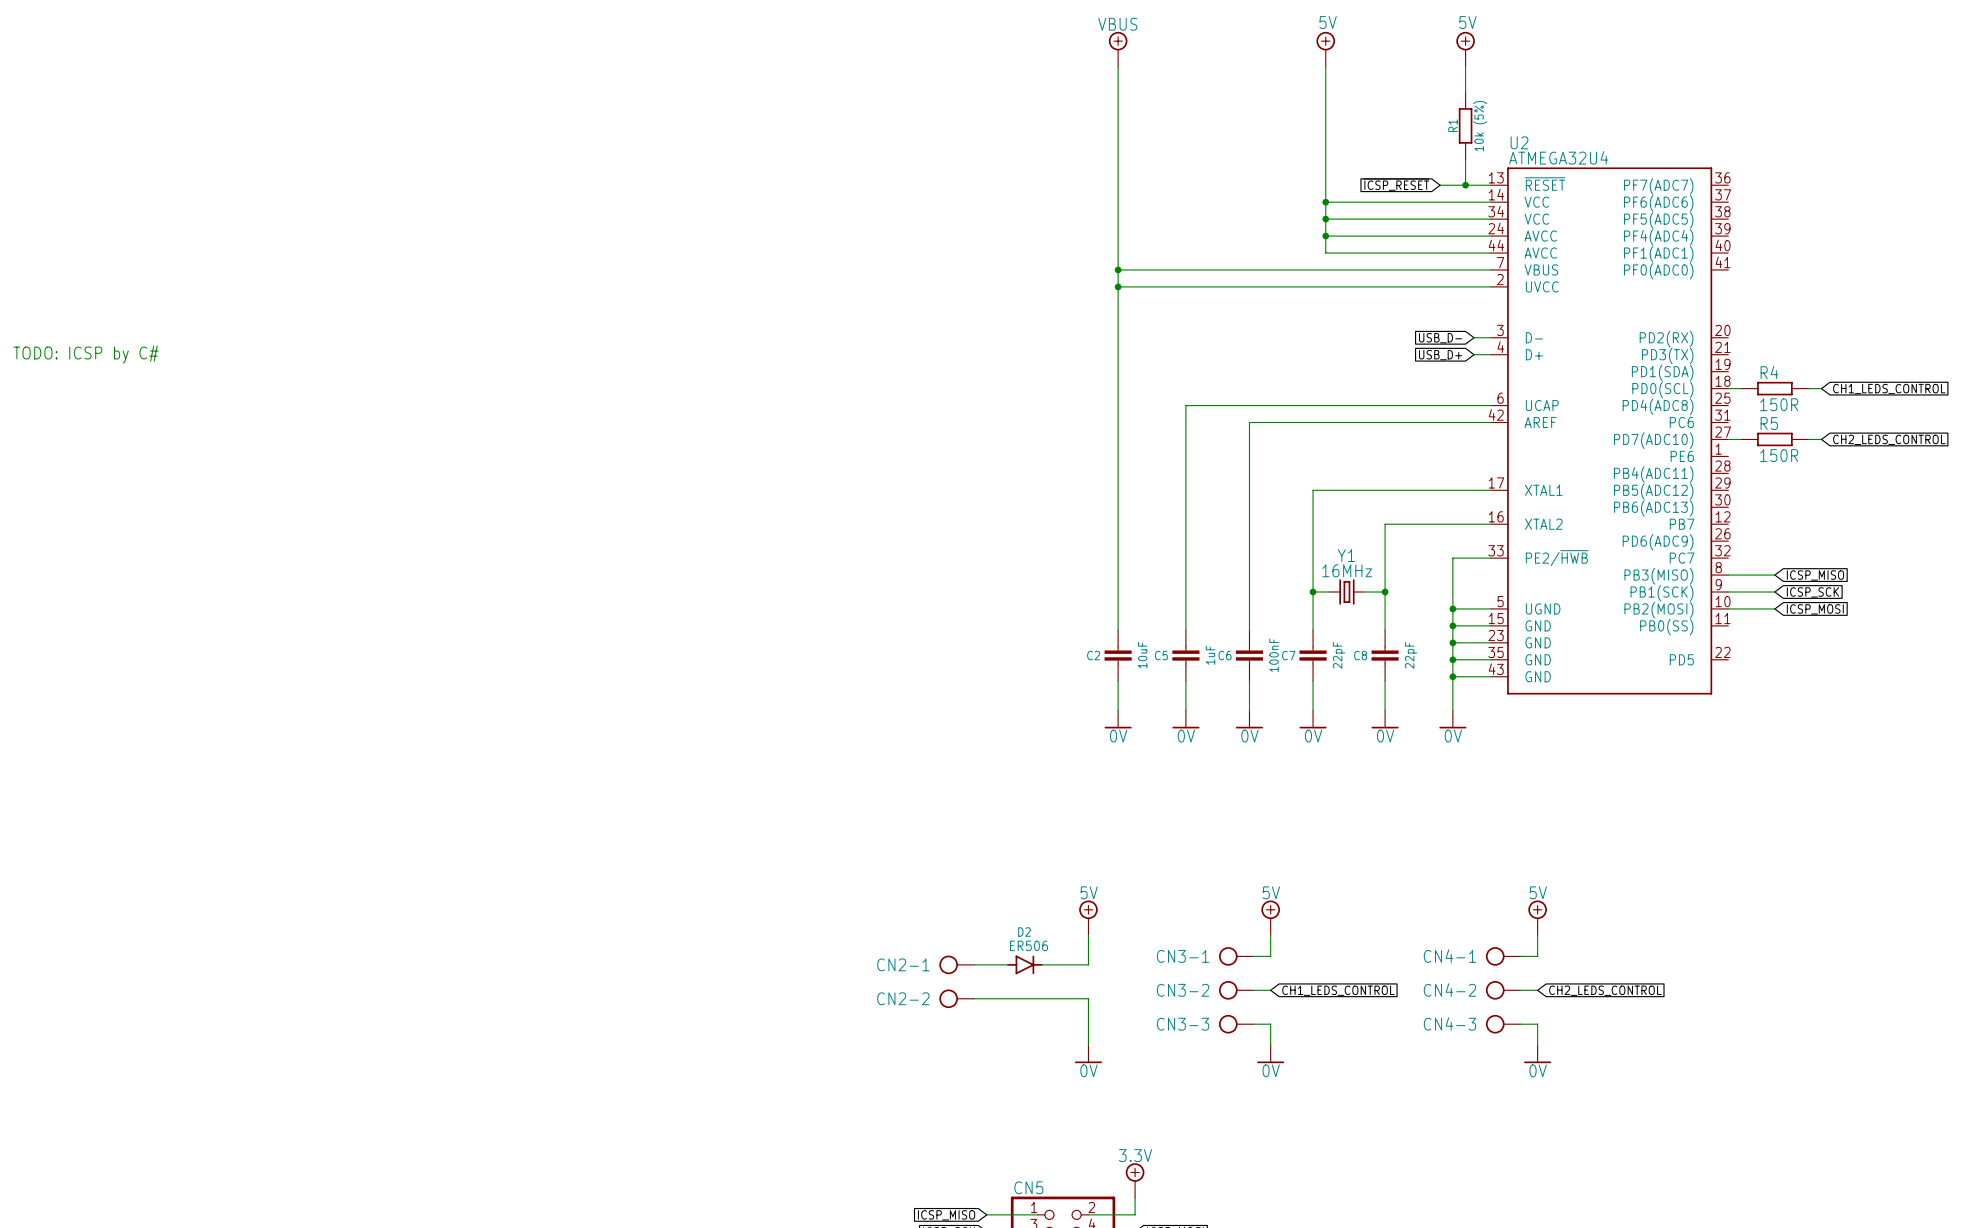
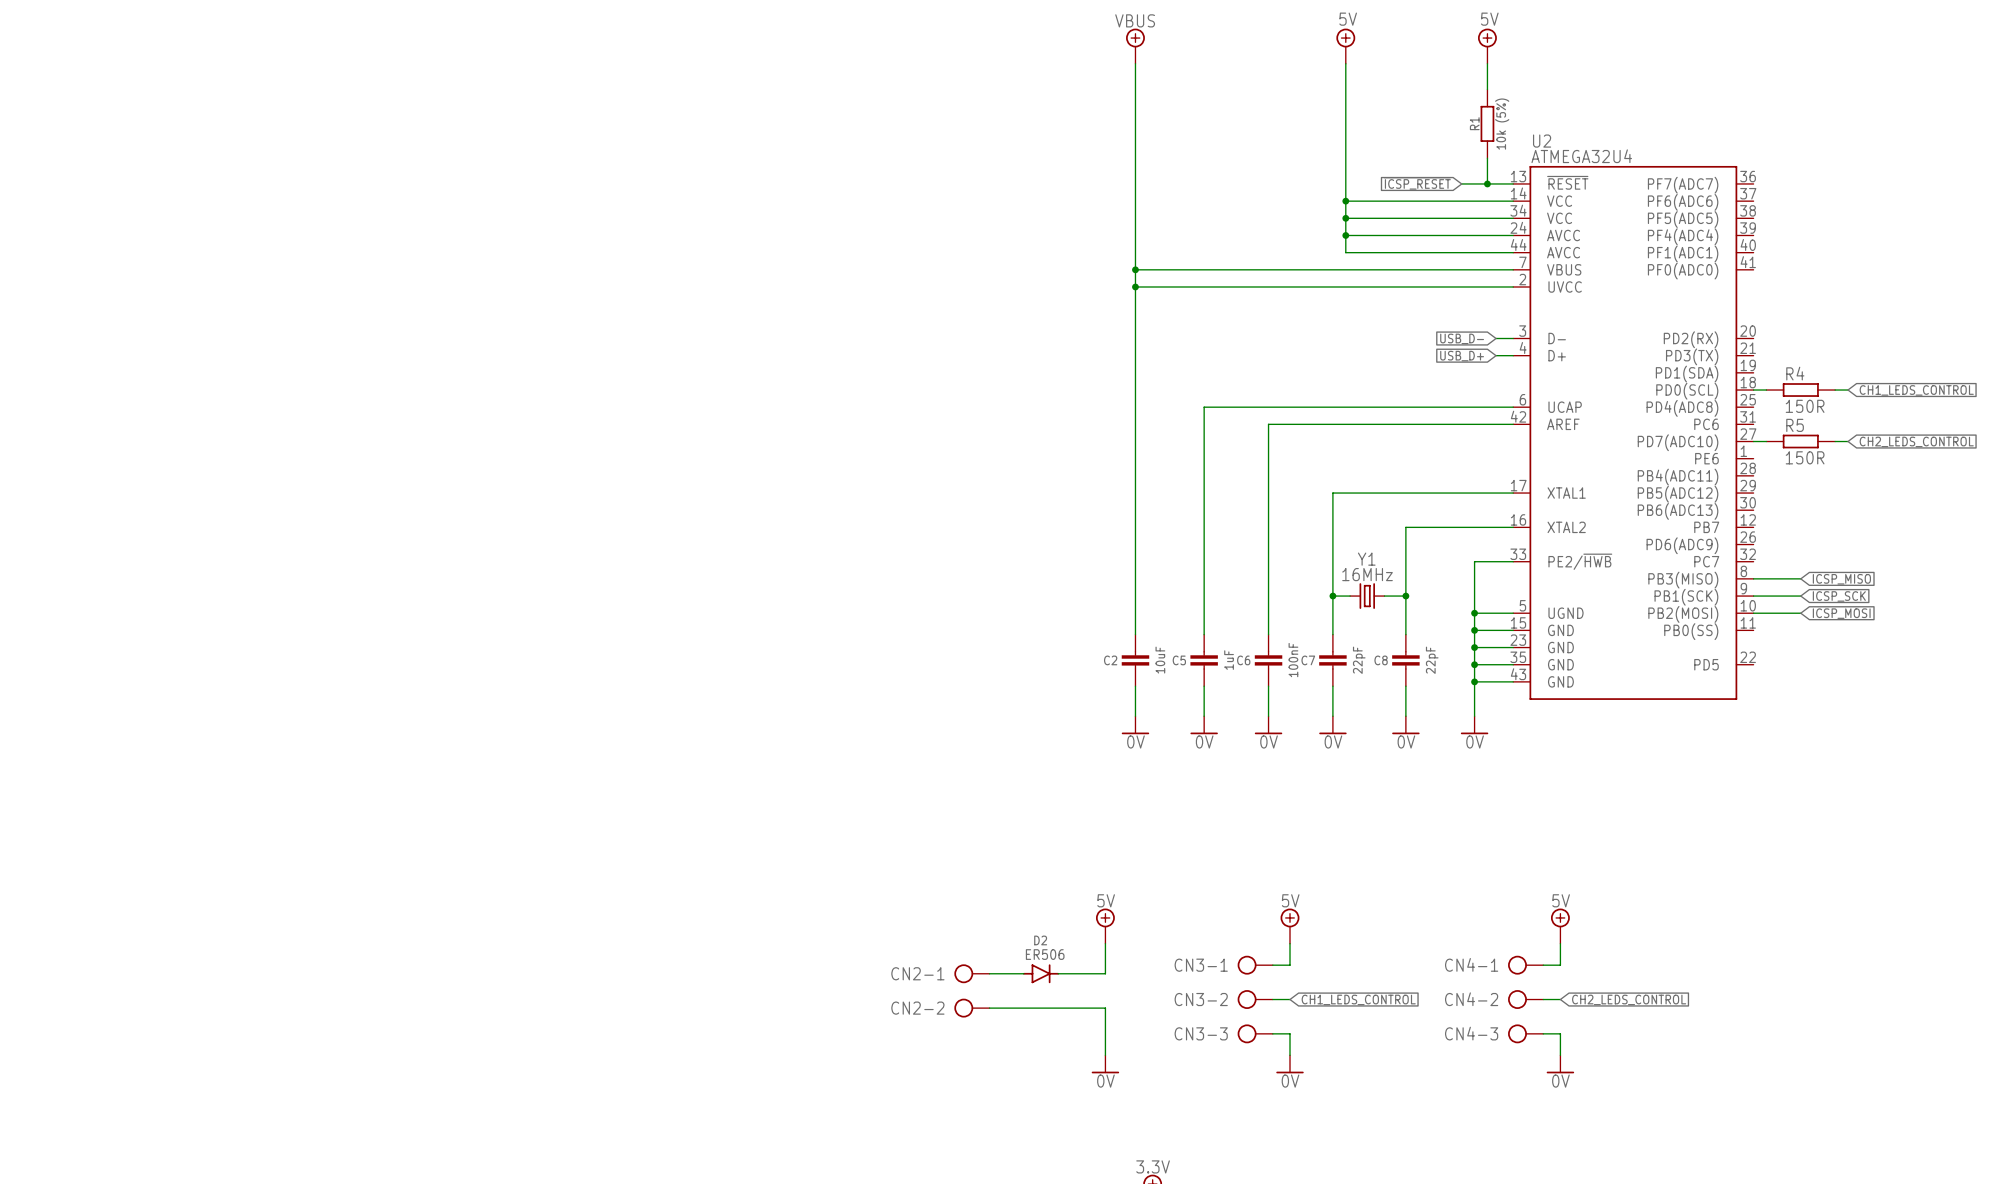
text: TODO: ICSP by C# (86, 354) -> none

